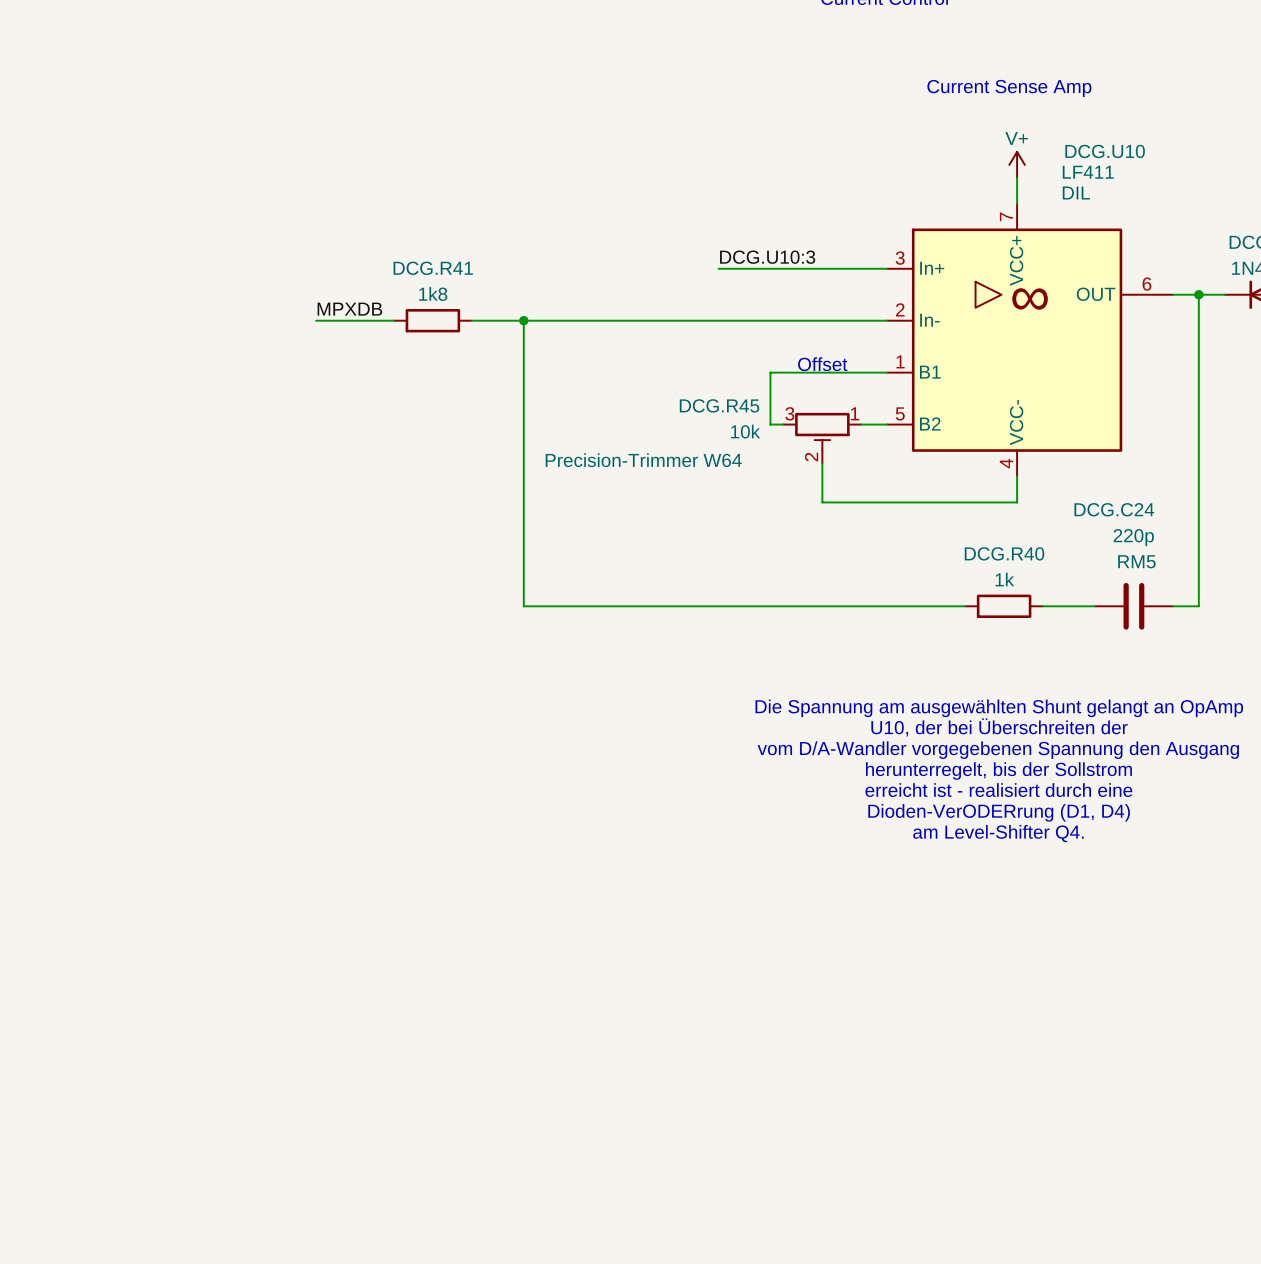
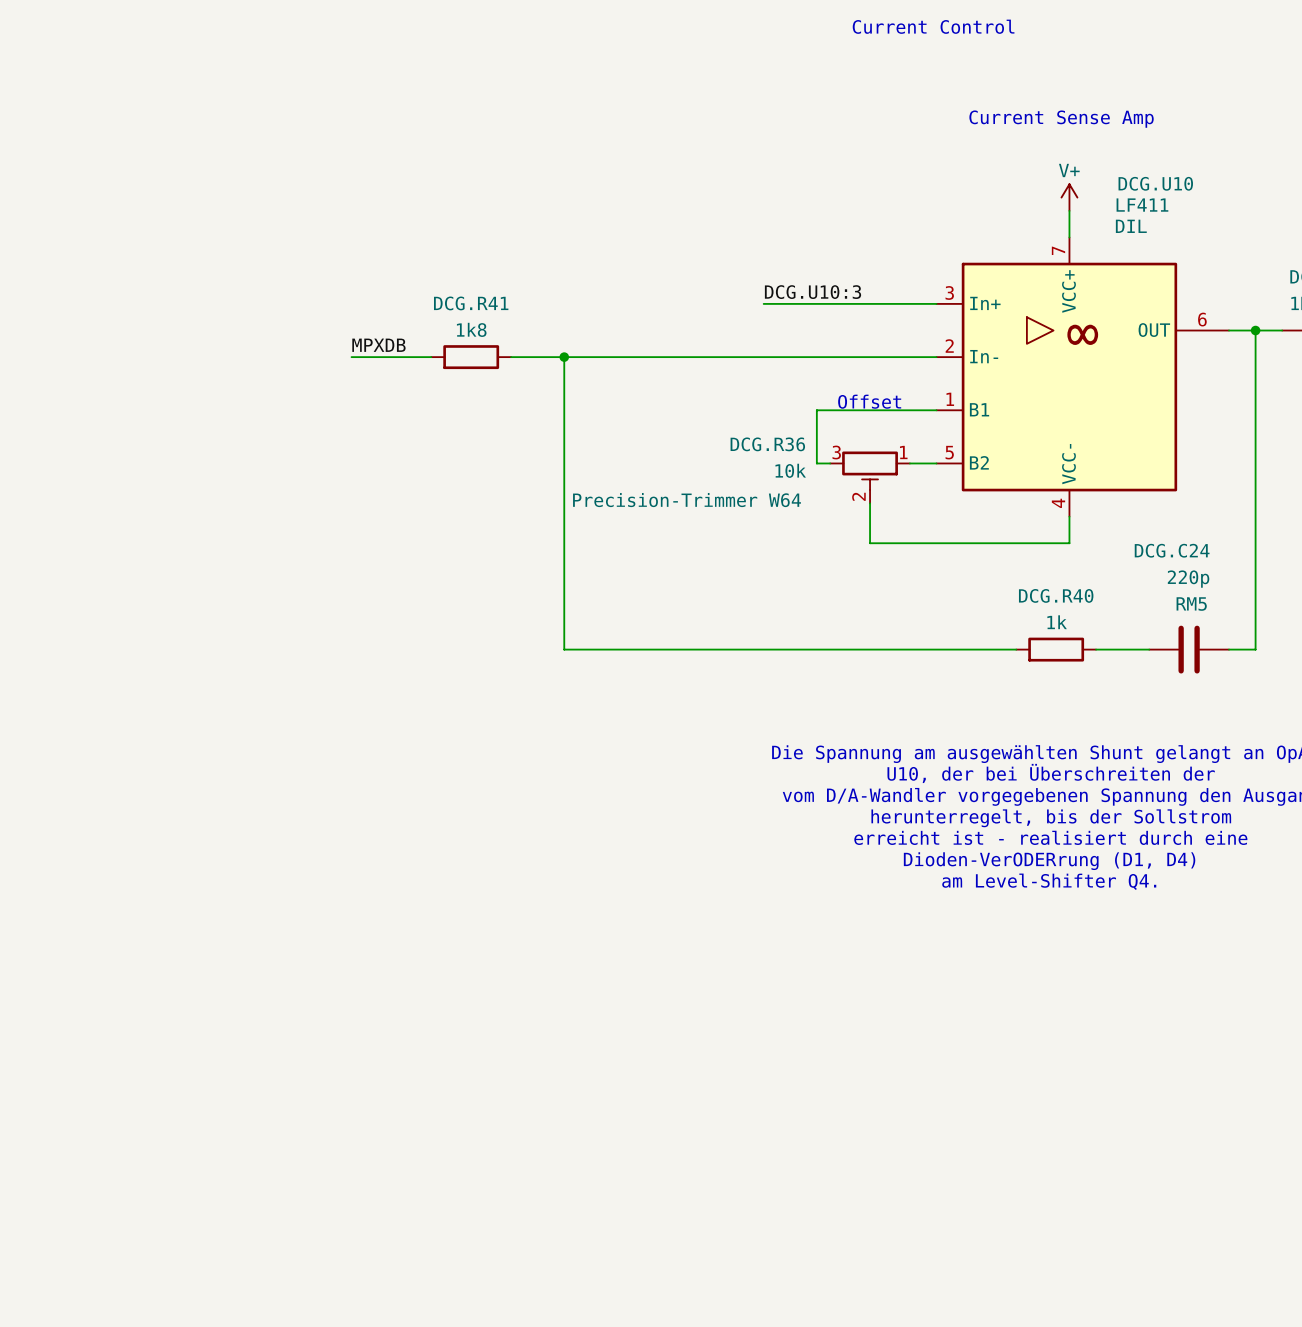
DCG.R45 name: DCG.R45 (719, 405) -> DCG.R36 (767, 444)

